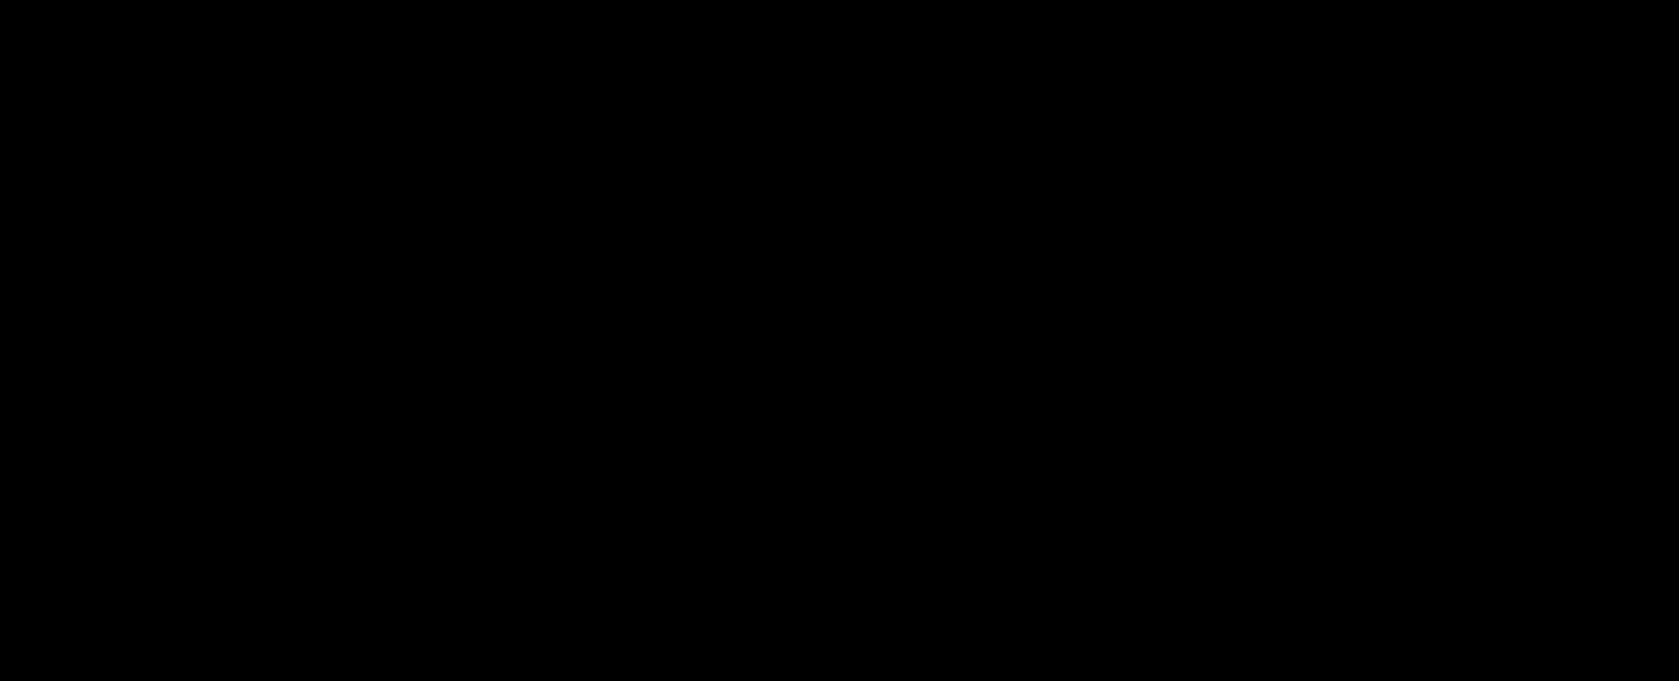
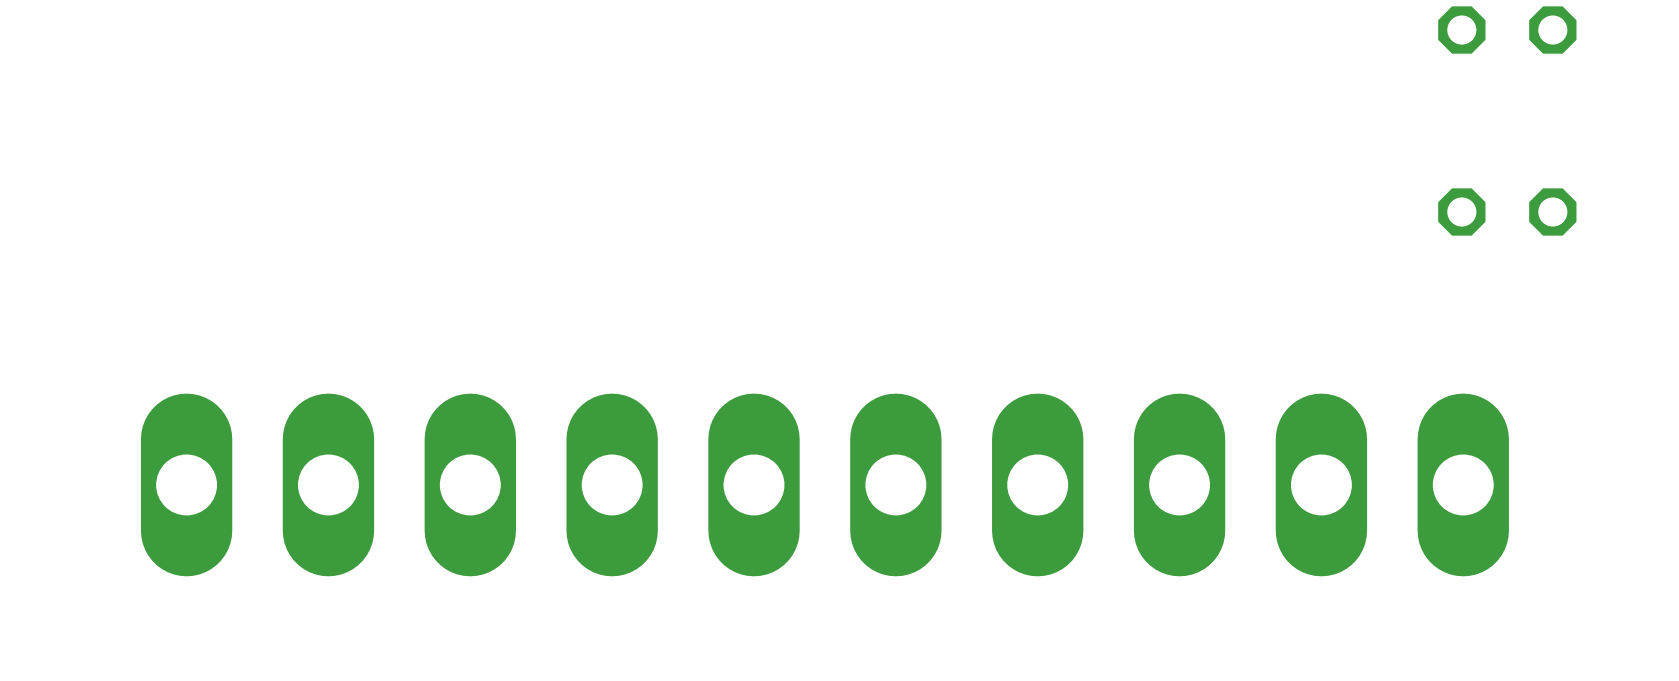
part: none -> (1507, 30)
part: none -> (1507, 212)
part: none -> (824, 484)

